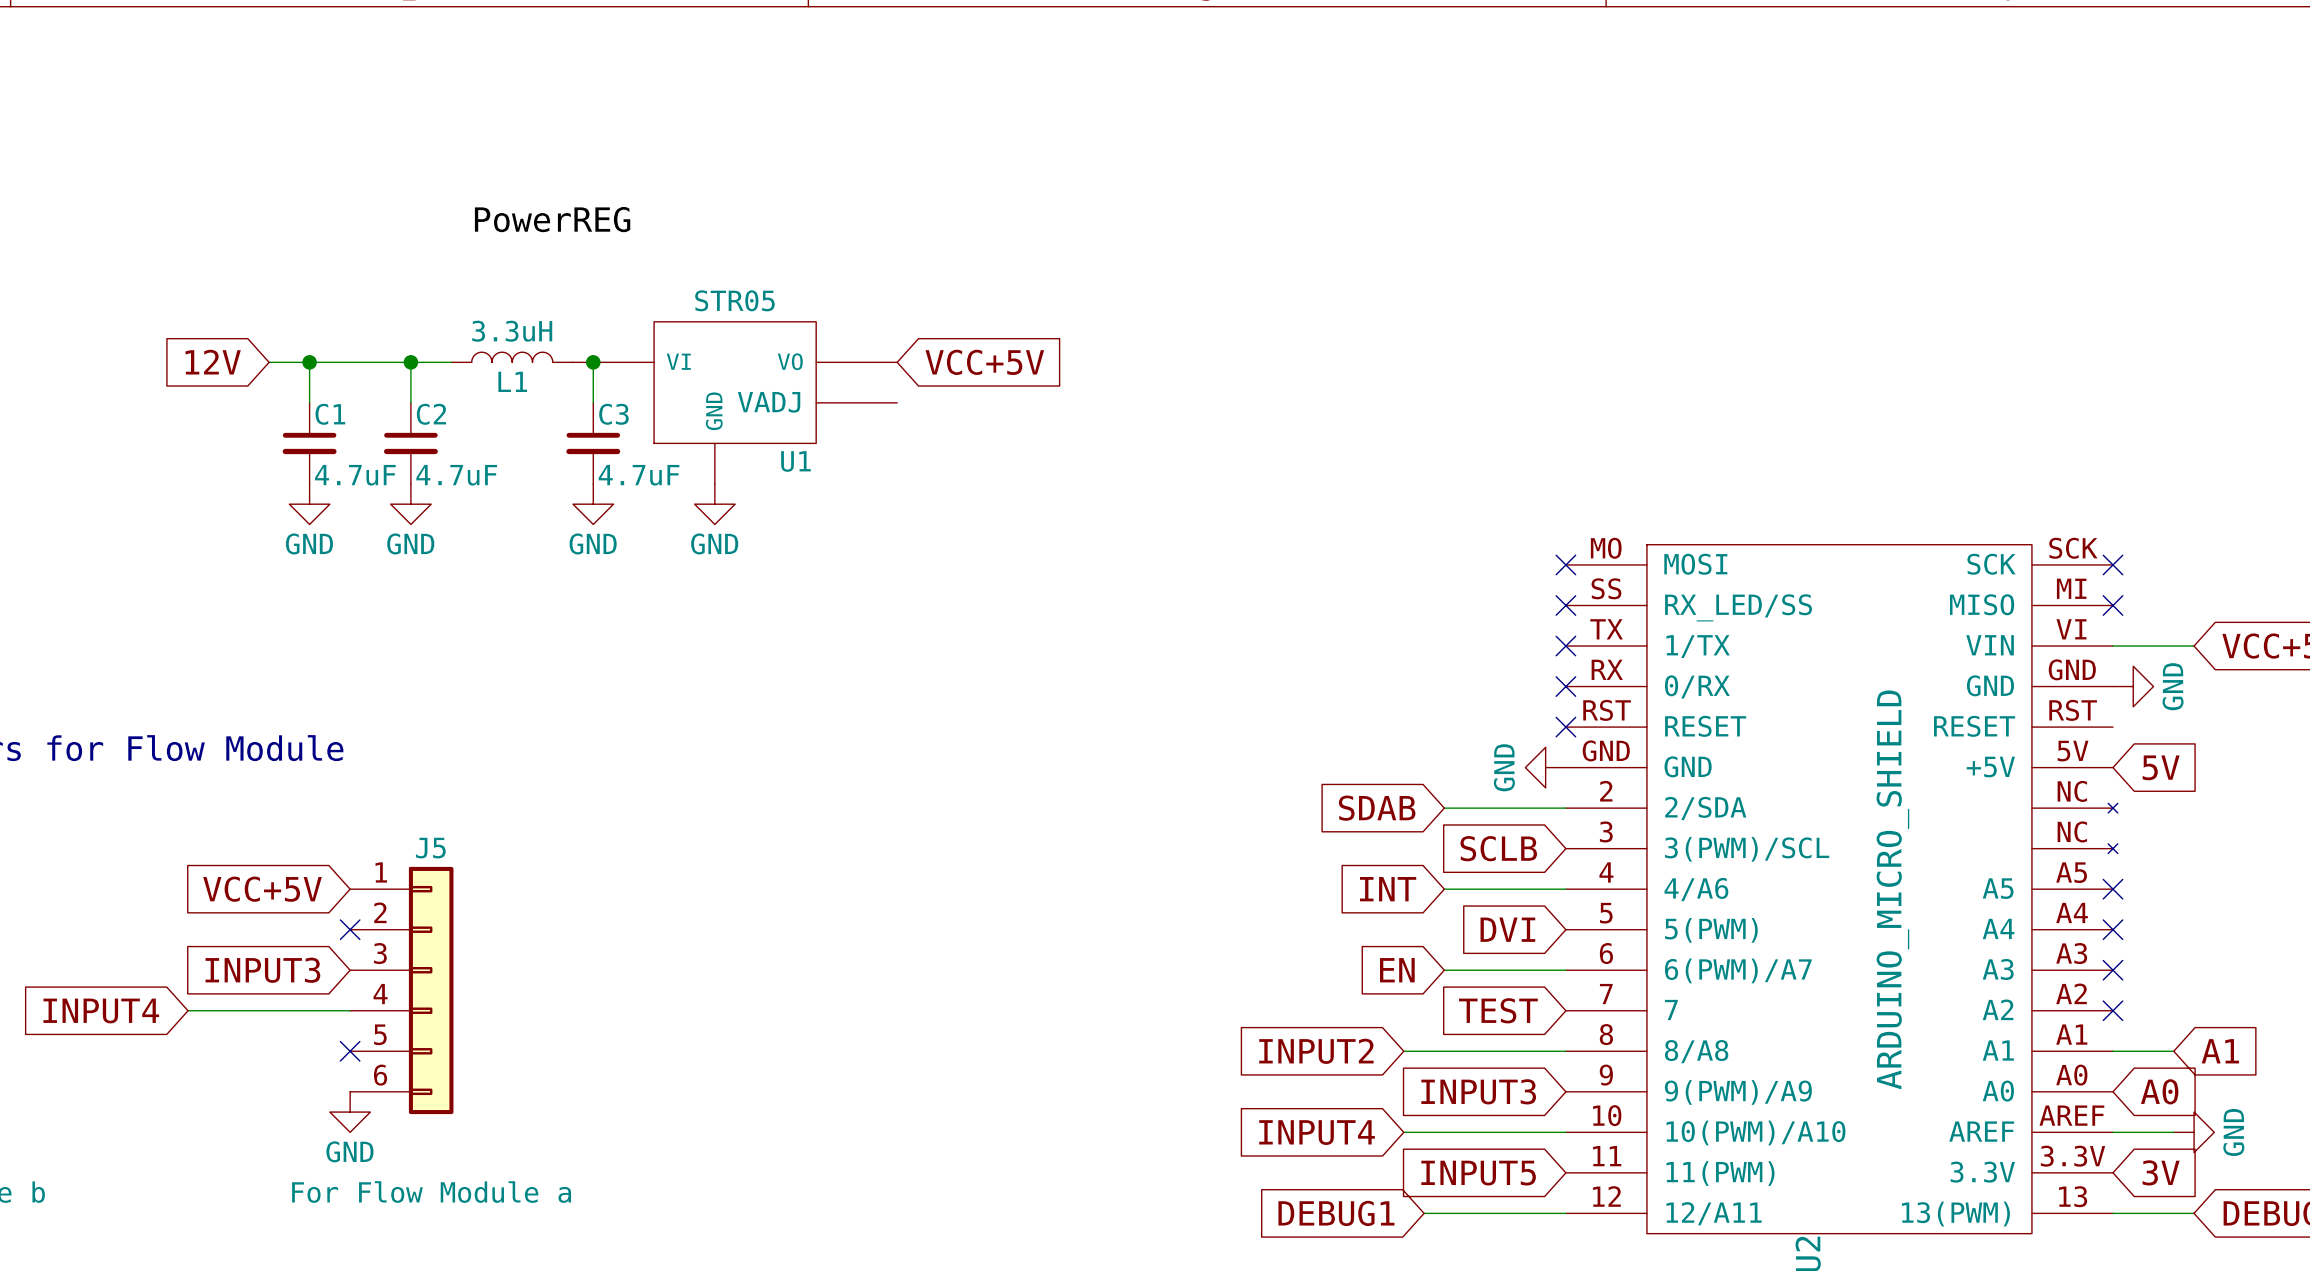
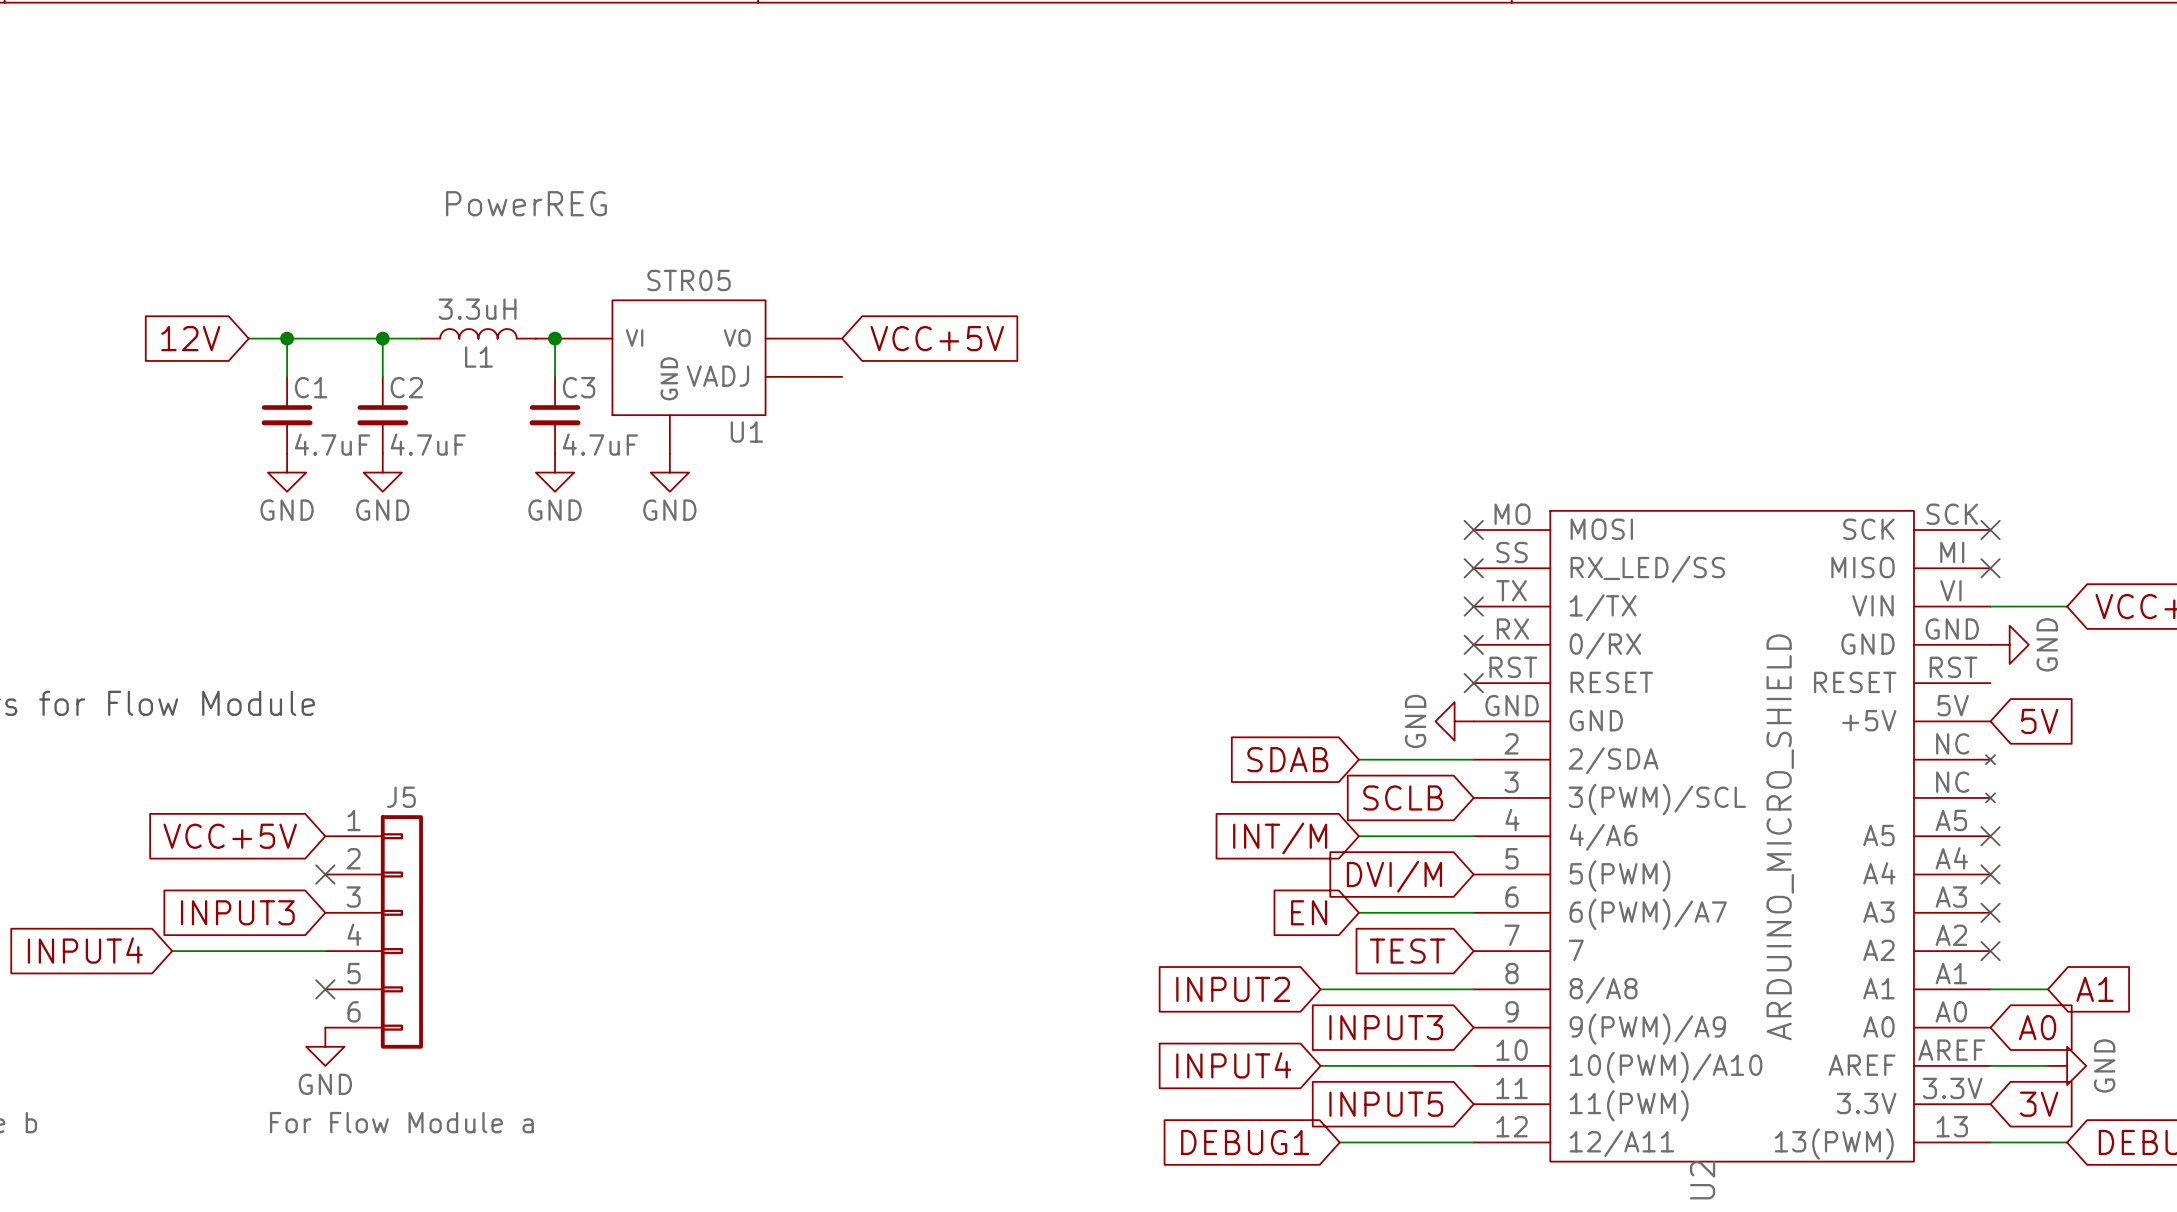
global label: INT (1388, 889) -> INT/M (1280, 838)
global label: DVI (1507, 929) -> DVI/M (1394, 876)

